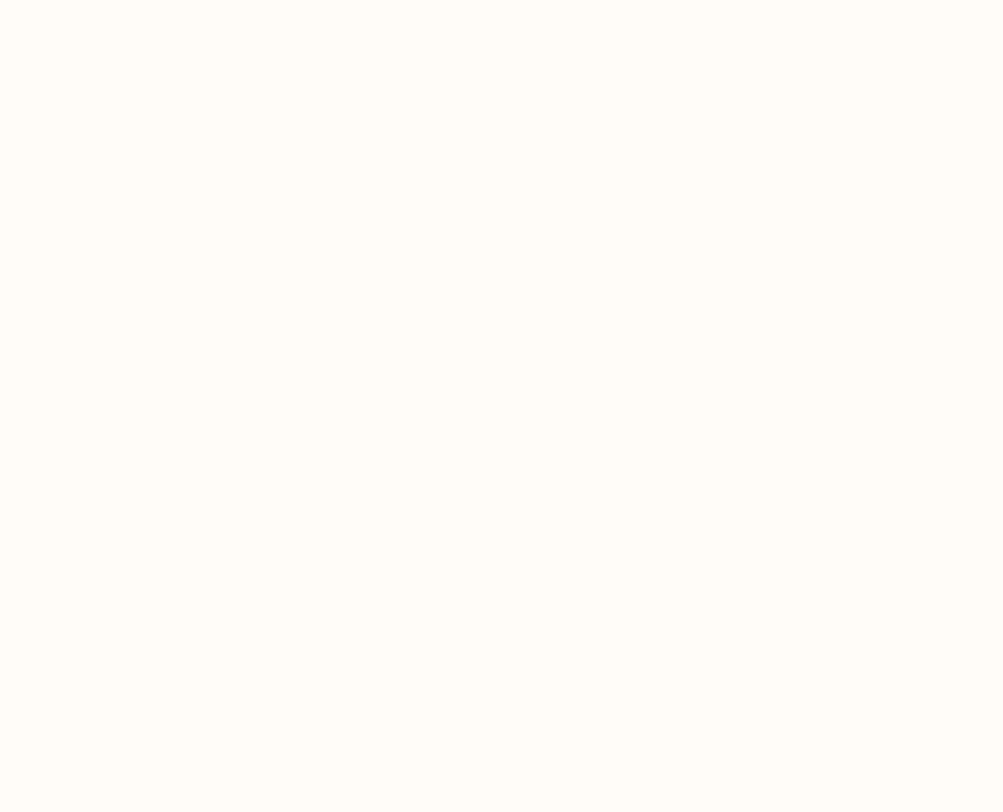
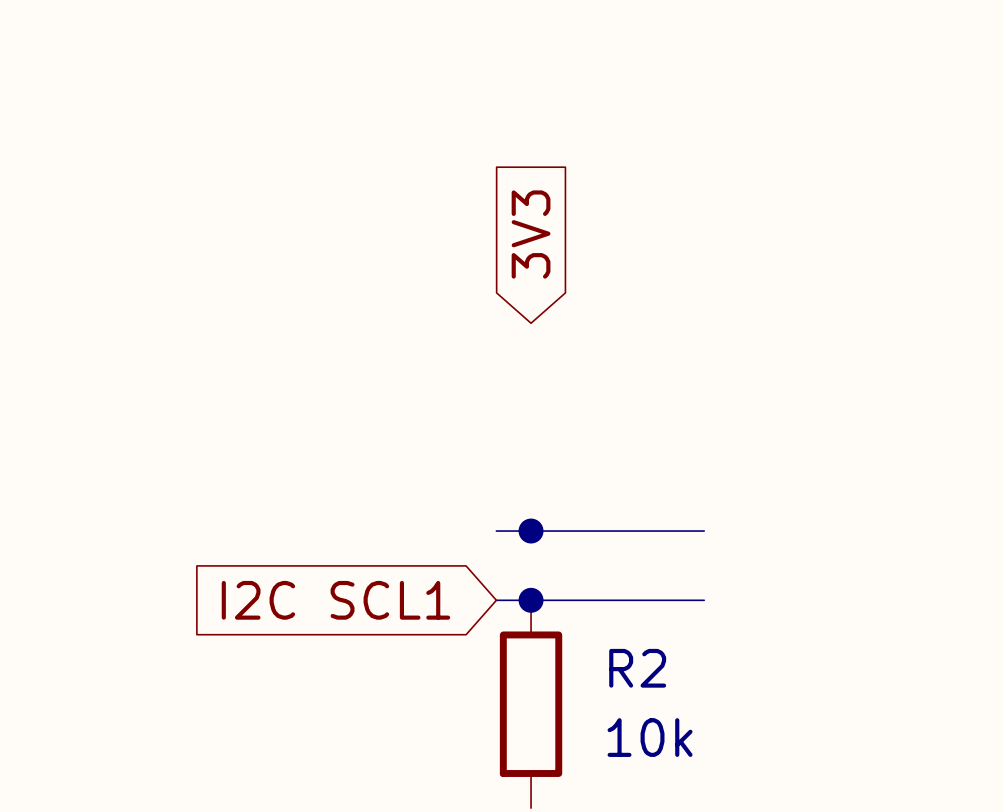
global label: none -> 3V3 (531, 234)
wire: none -> (496, 531) (704, 531)
junction: none -> (531, 531)
global label: none -> I2C SCL1 (335, 600)
wire: none -> (496, 600) (704, 600)
junction: none -> (531, 600)
R2: none -> 10k (531, 704)

